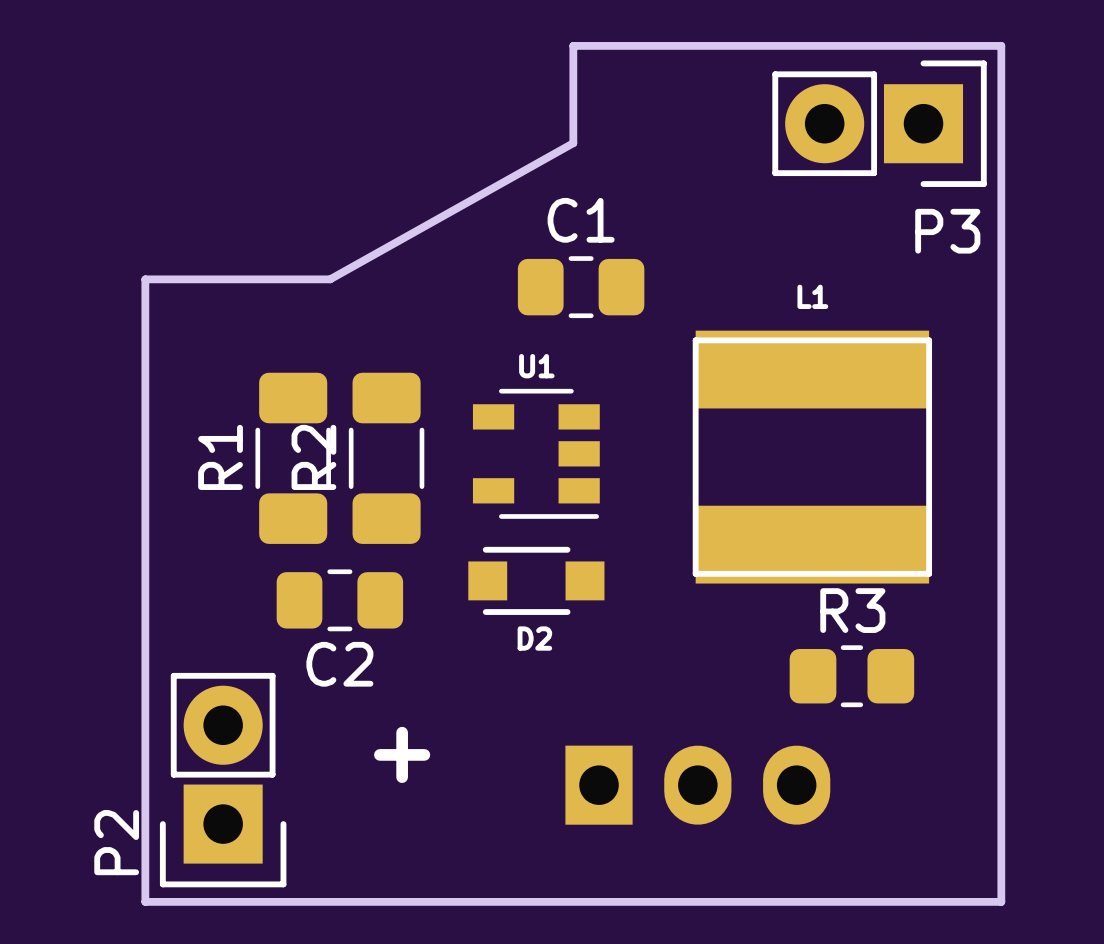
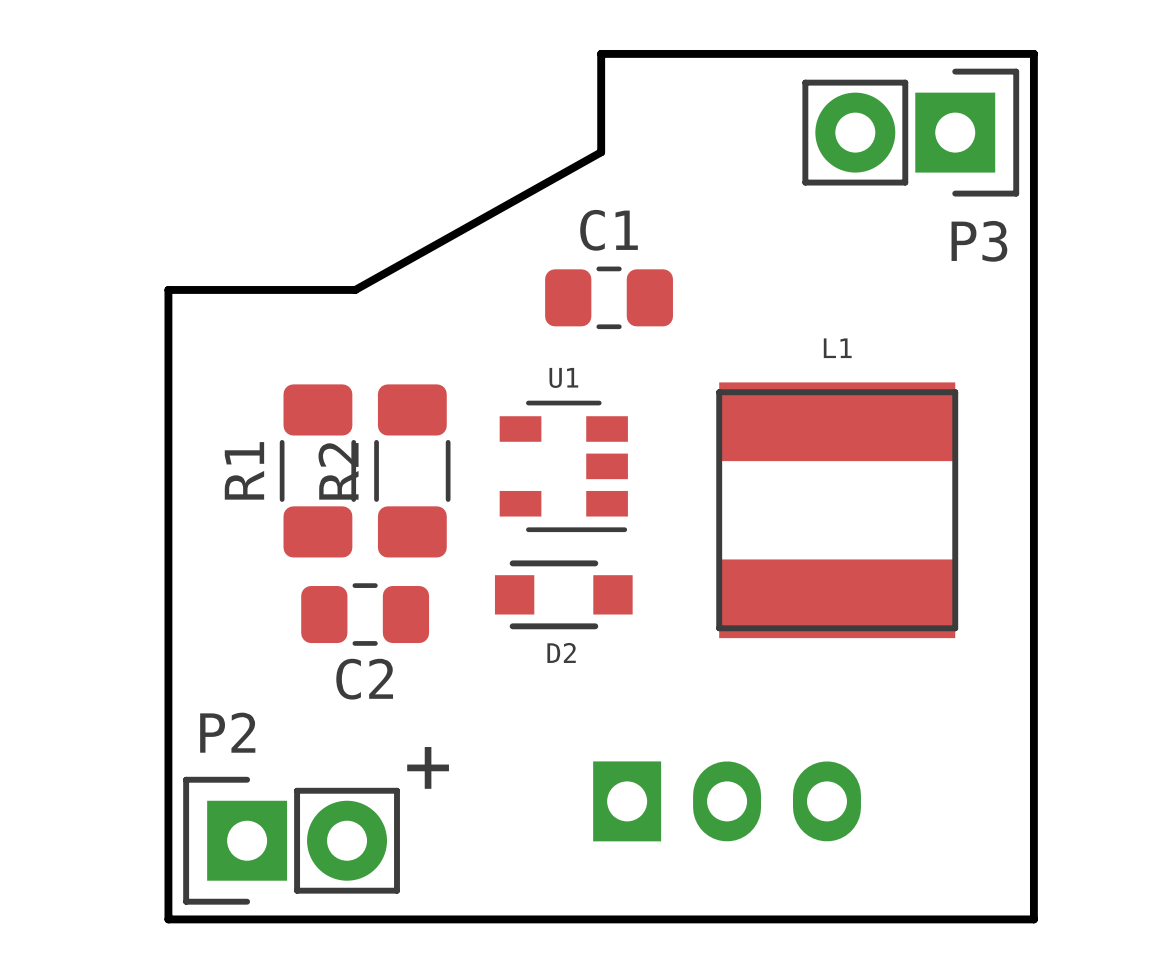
L1 position: (812, 457) -> (837, 510)
R3: (851, 676) -> none
P2 rotation: 0° (223, 780) -> 90° clockwise (291, 840)

